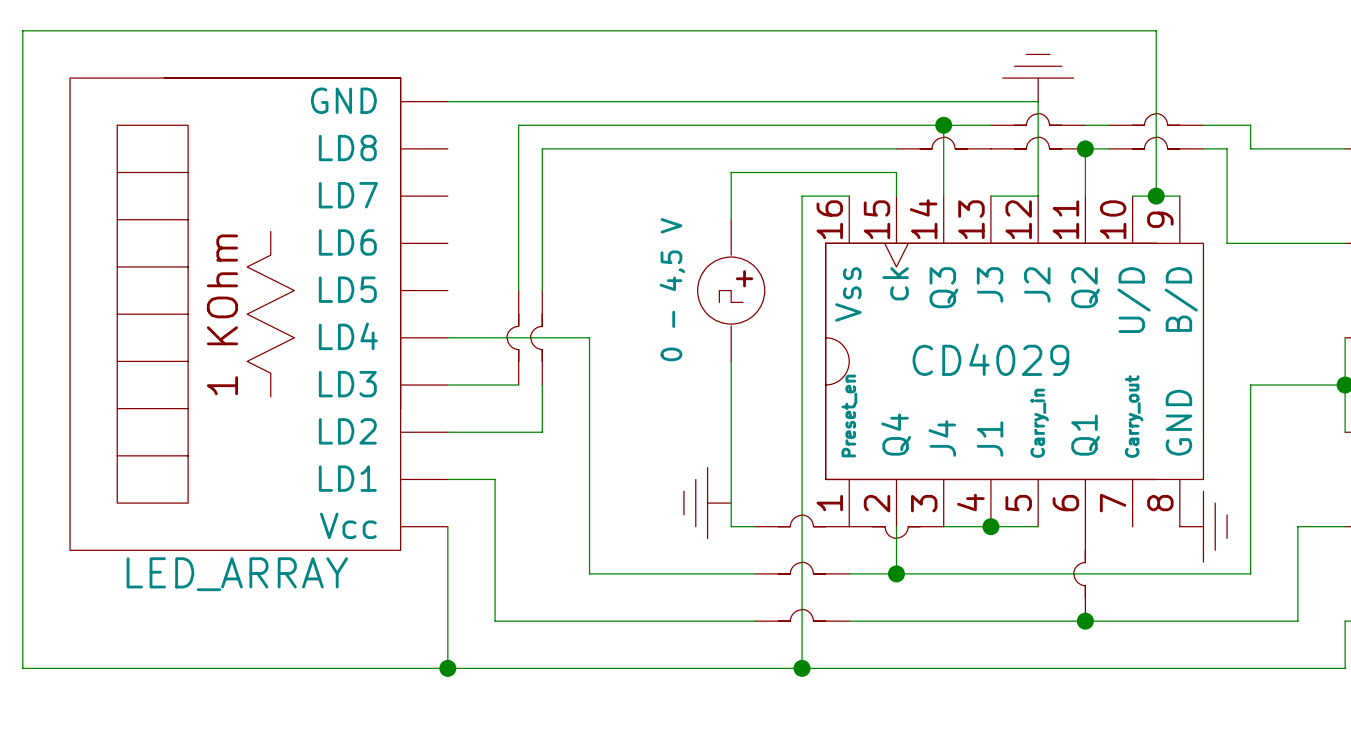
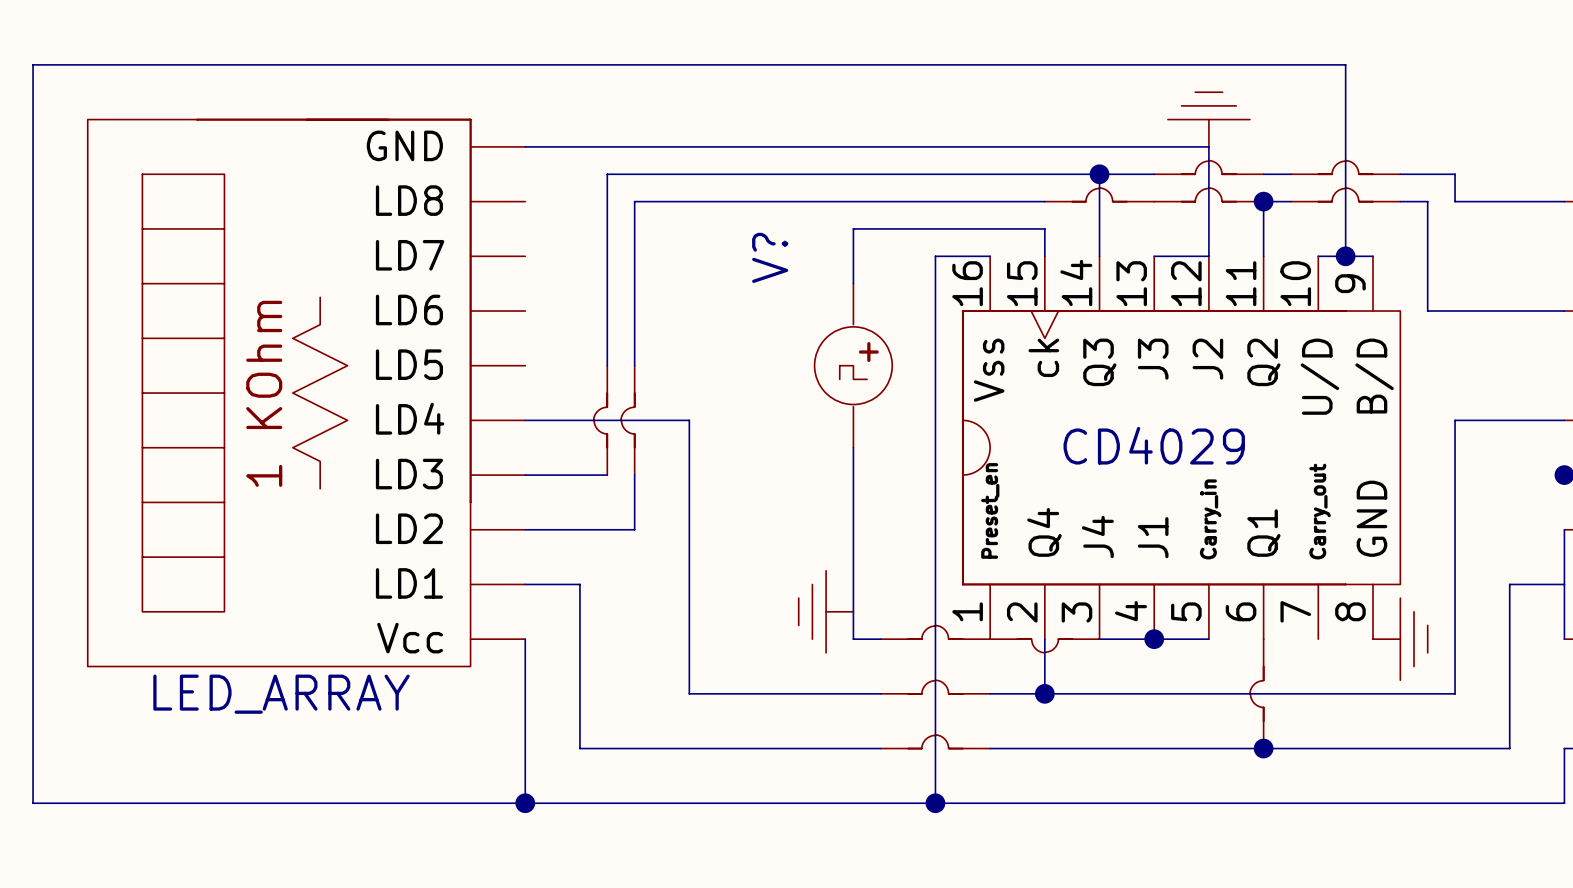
0 - 4,5 V name: 0 - 4,5 V (672, 289) -> V? (770, 257)
wire: (1345, 337) (1345, 432) -> (1564, 639) (1564, 529)
wire: (1250, 385) (1345, 385) -> (1455, 475) (1455, 420) (1564, 420)
wire: (1297, 526) (1345, 526) -> (1509, 639) (1509, 584) (1564, 584)

